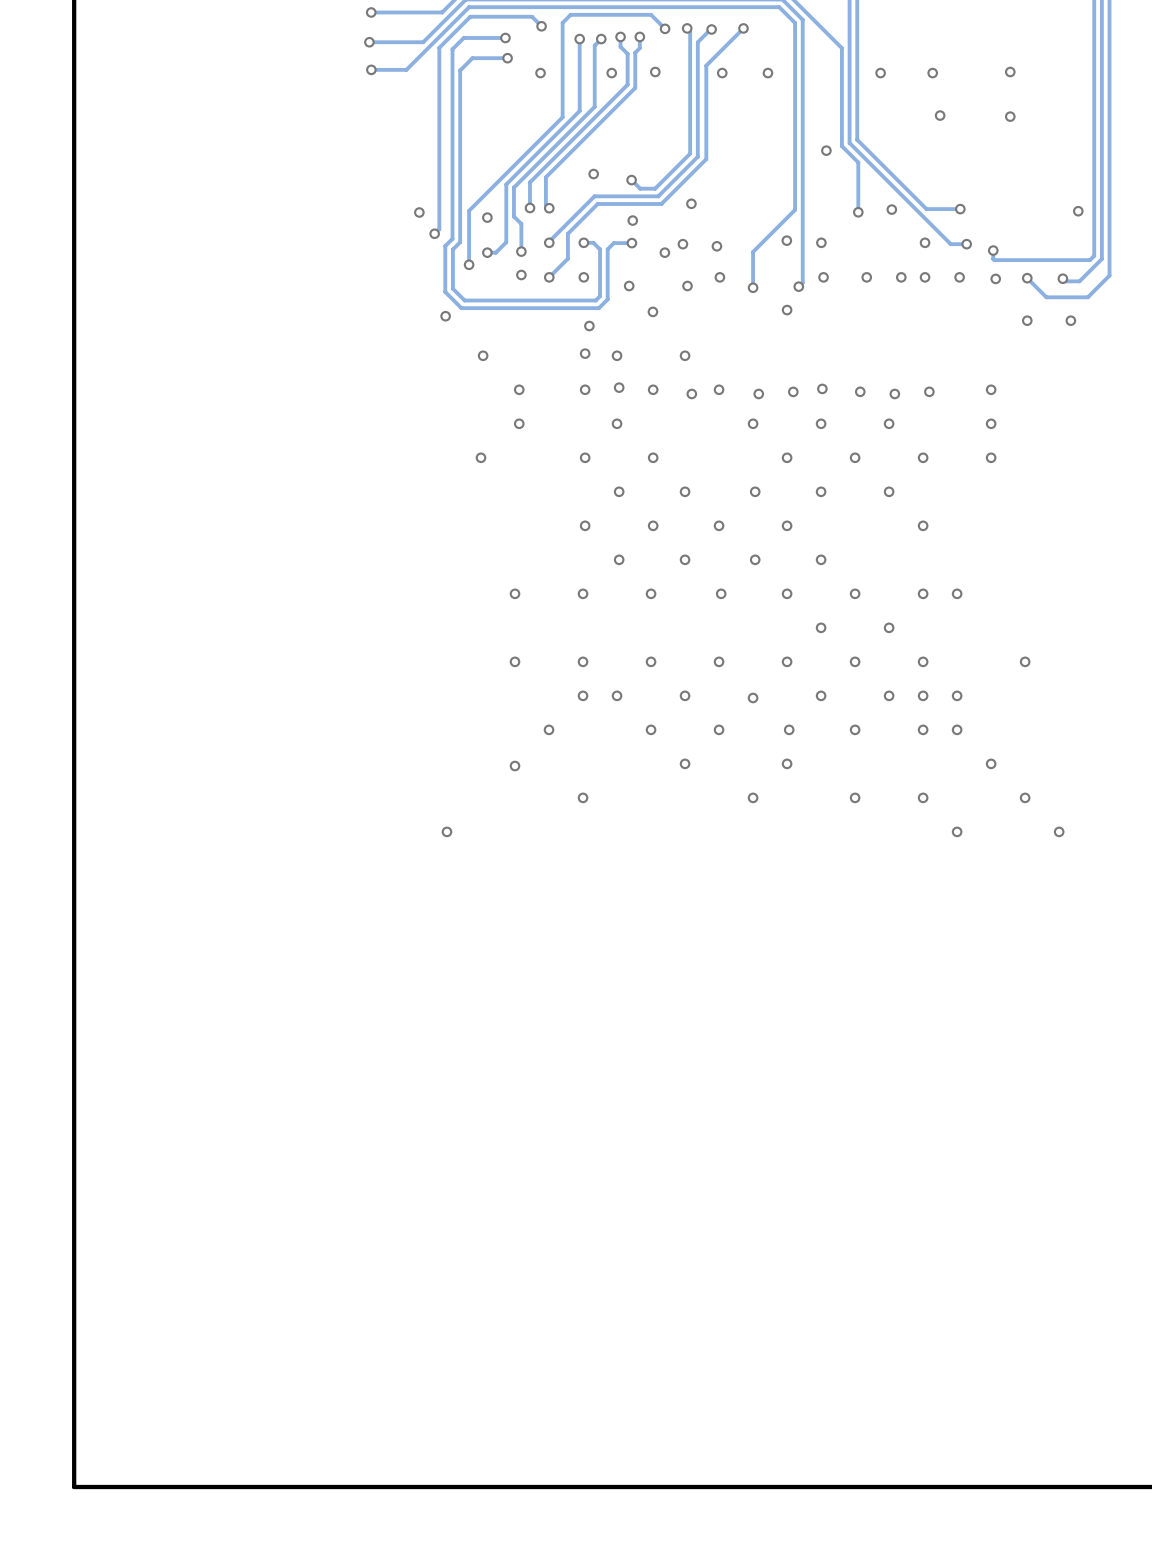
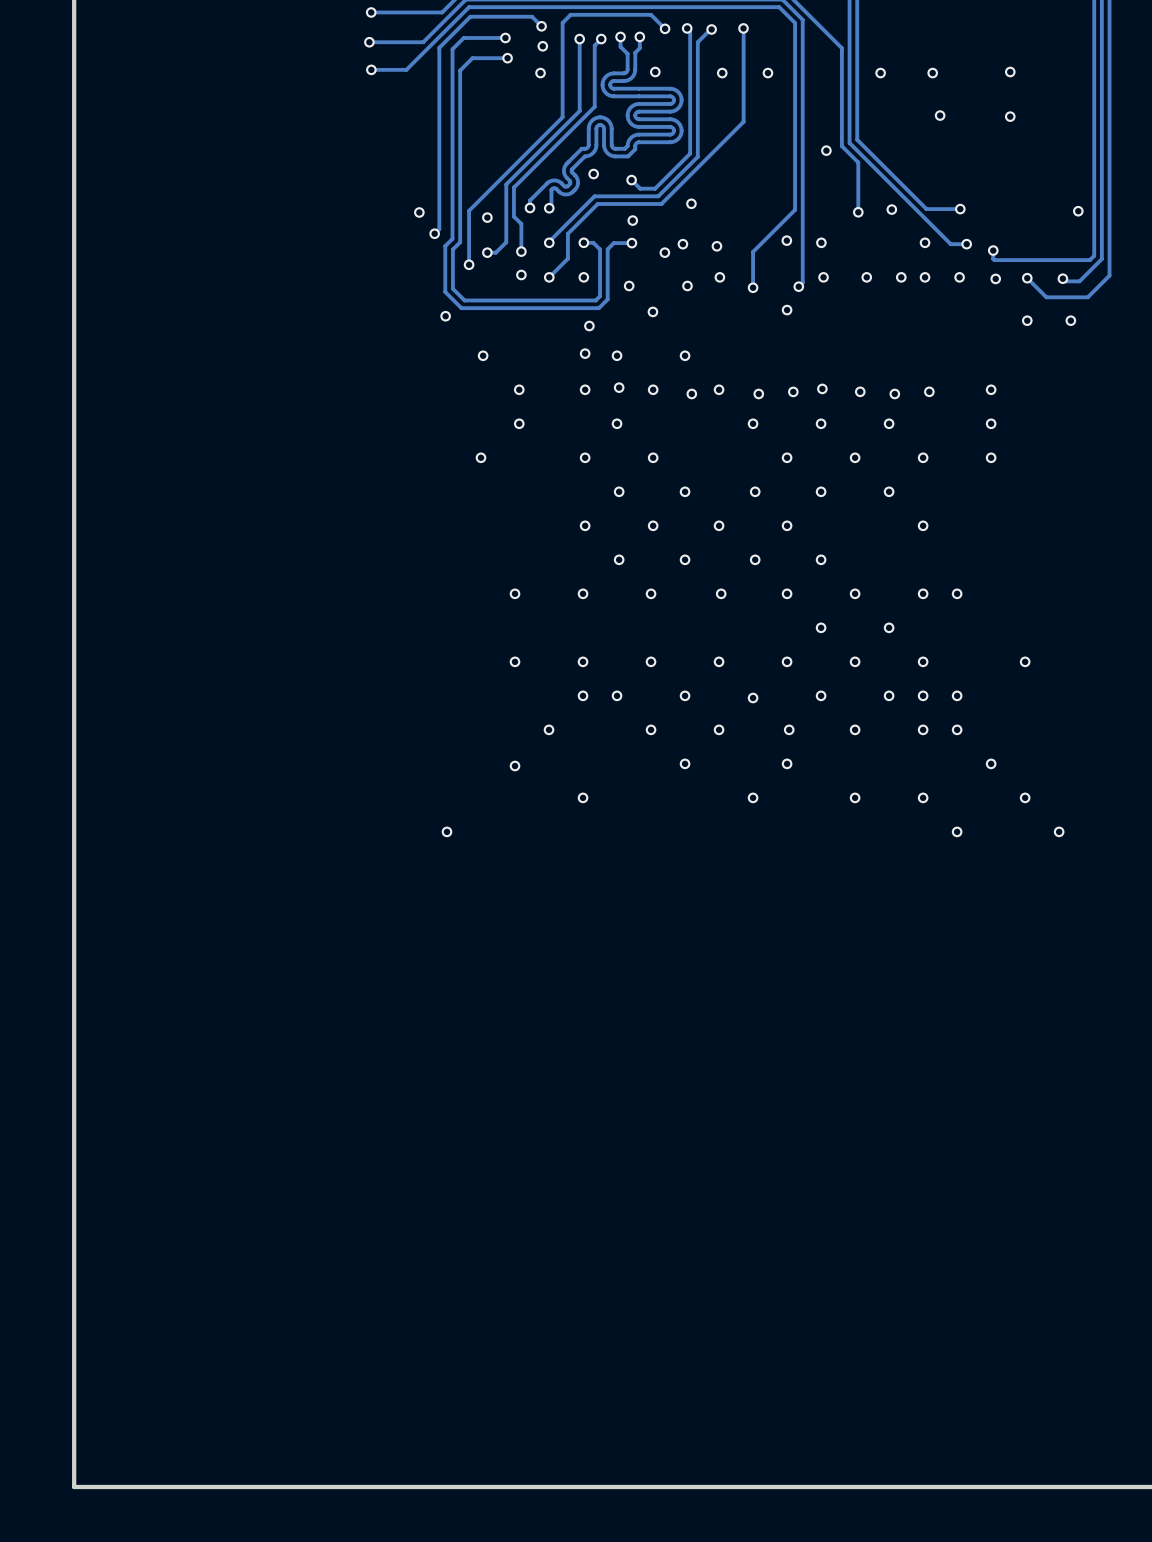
track: (743, 28) (706, 65) (706, 159) -> (743, 28) (743, 121) (706, 159)
track: (627, 69) (627, 84) (530, 182) (530, 200) -> (627, 69) (625, 73) (612, 73) (605, 76) (602, 84) (604, 91) (612, 96) (672, 96) (673, 101) (670, 103) (634, 104) (629, 109) (627, 115) (629, 122) (634, 126) (670, 127) (673, 129) (673, 133) (636, 134) (629, 139) (624, 148) (614, 148) (611, 145) (610, 123) (603, 117) (595, 118) (589, 125) (588, 146) (581, 148) (564, 166) (564, 173) (570, 181) (569, 184) (565, 186) (558, 181) (550, 181) (530, 200)
track: (635, 69) (635, 87) (545, 177) (545, 204) (549, 208) -> (635, 69) (630, 78) (612, 81) (610, 86) (614, 88) (670, 88) (677, 91) (681, 100) (680, 105) (675, 110) (638, 111) (635, 115) (638, 119) (674, 120) (681, 127) (680, 136) (671, 142) (637, 142) (635, 149) (628, 156) (614, 156) (605, 150) (603, 127) (598, 125) (596, 128) (594, 150) (590, 154) (584, 156) (571, 169) (577, 179) (576, 187) (571, 192) (566, 194) (552, 188) (551, 206) (549, 208)
via position: (611, 73) -> (542, 46)

